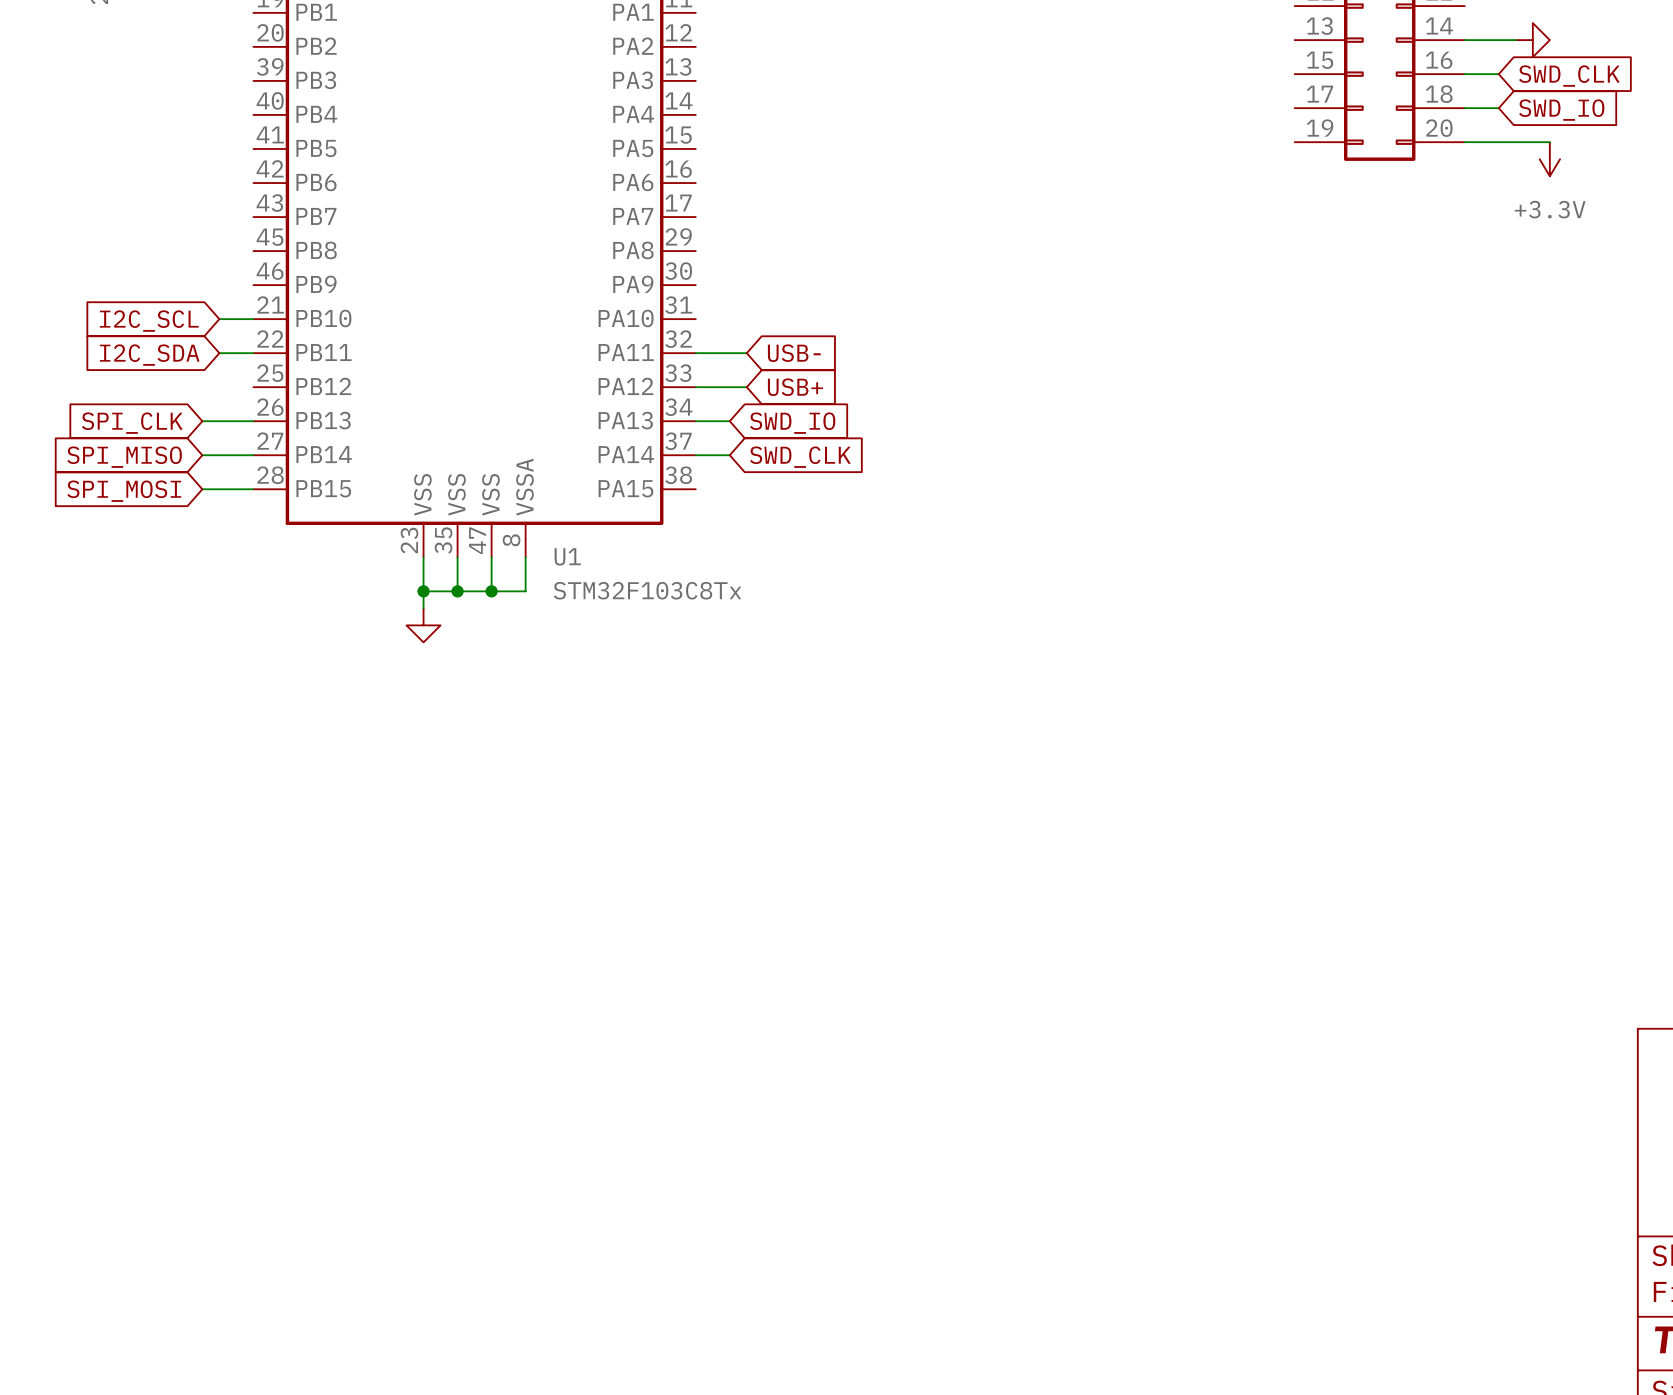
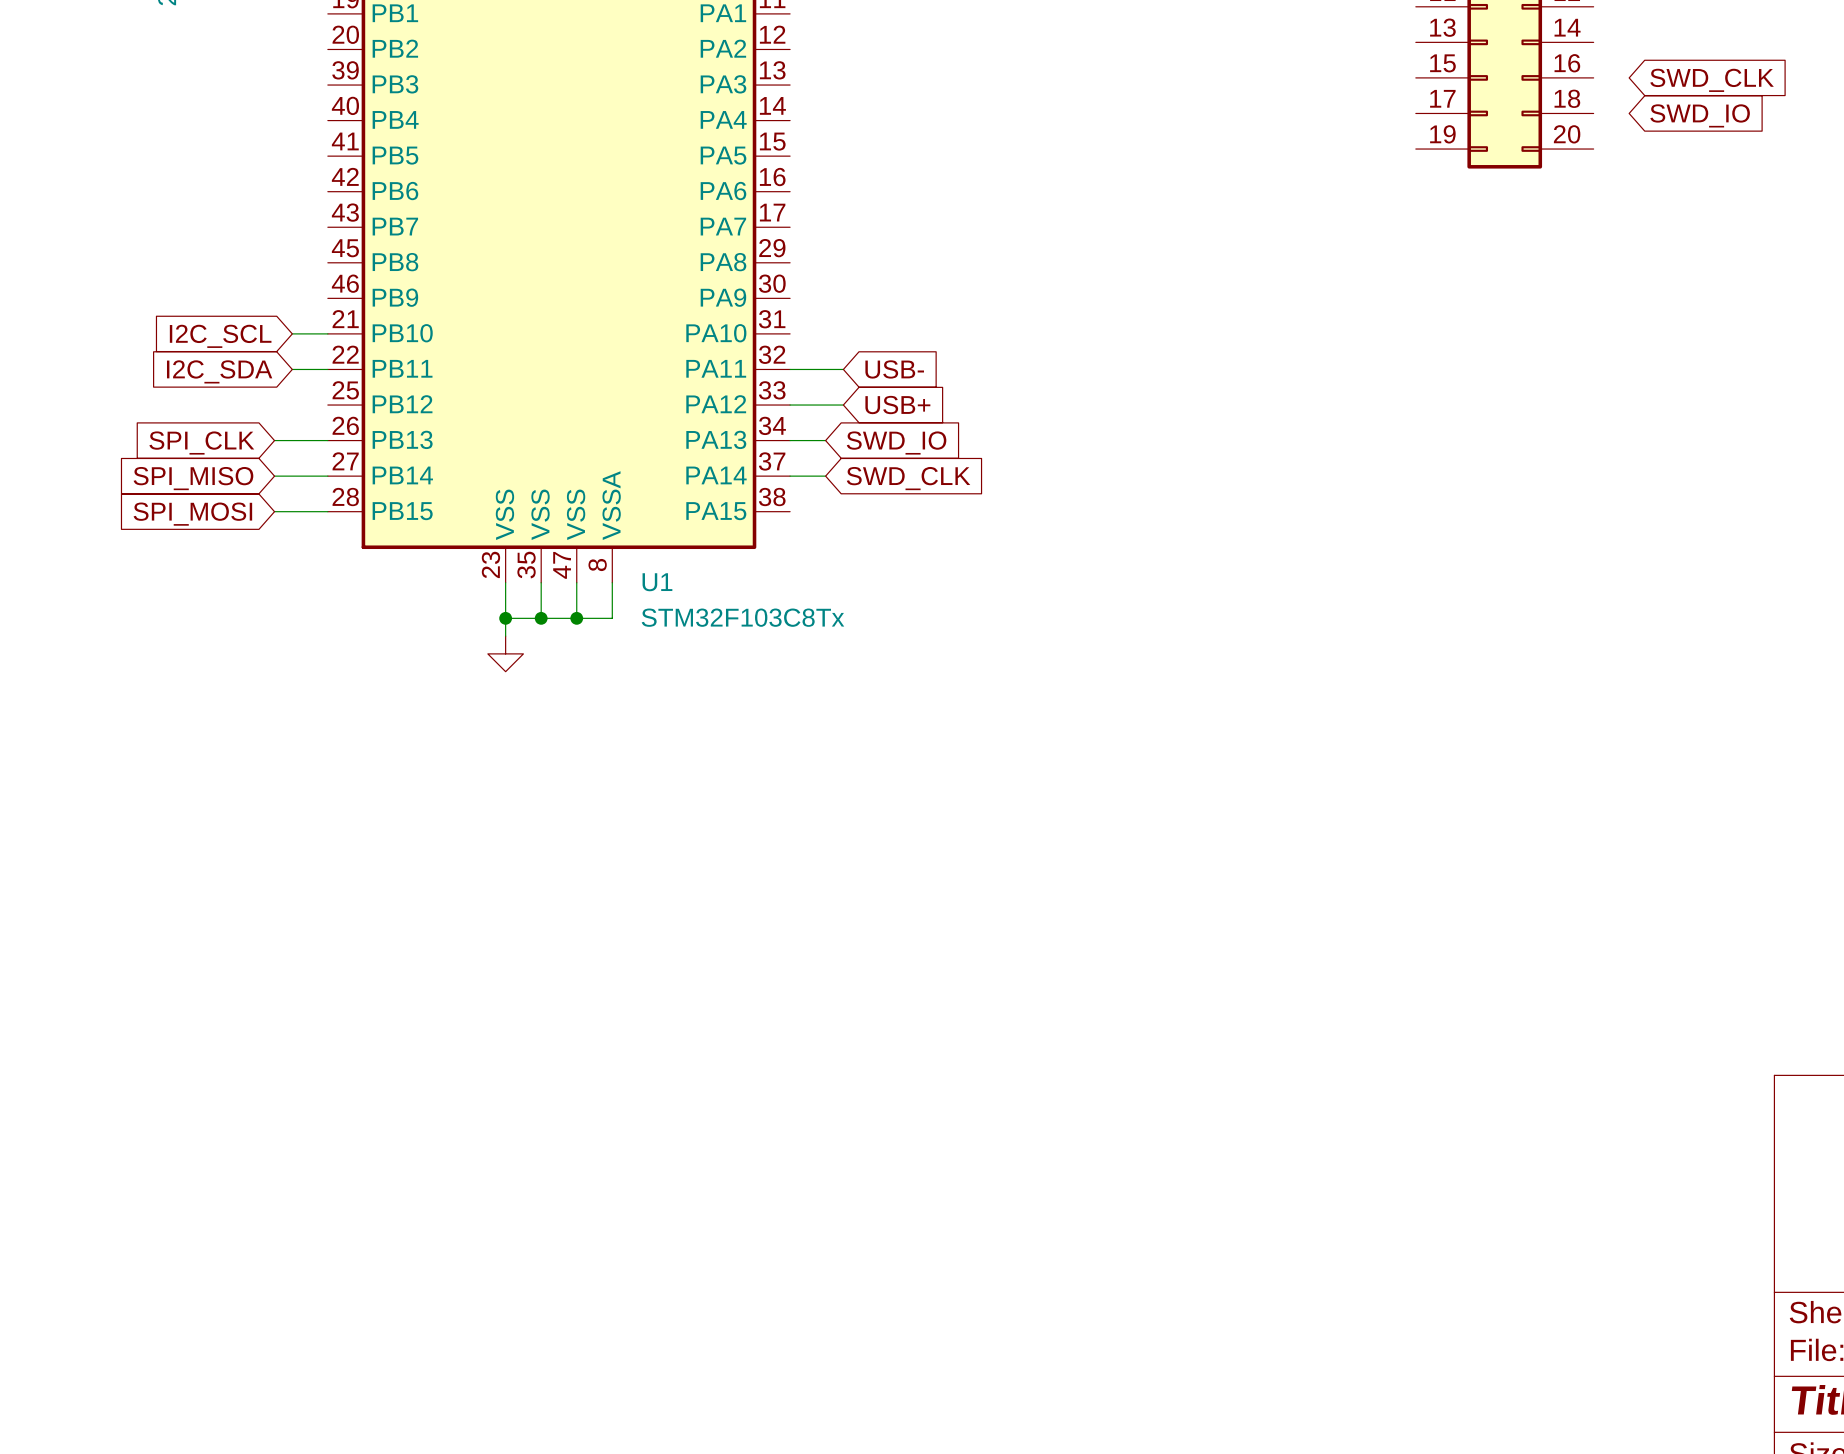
wire: (1464, 40) (1515, 40) -> none
power symbol: (1532, 40) -> none
wire: (1464, 74) (1498, 74) -> none
wire: (1464, 108) (1498, 108) -> none
wire: (1464, 142) (1549, 142) -> none
power symbol: +3.3V (1549, 159) -> none

